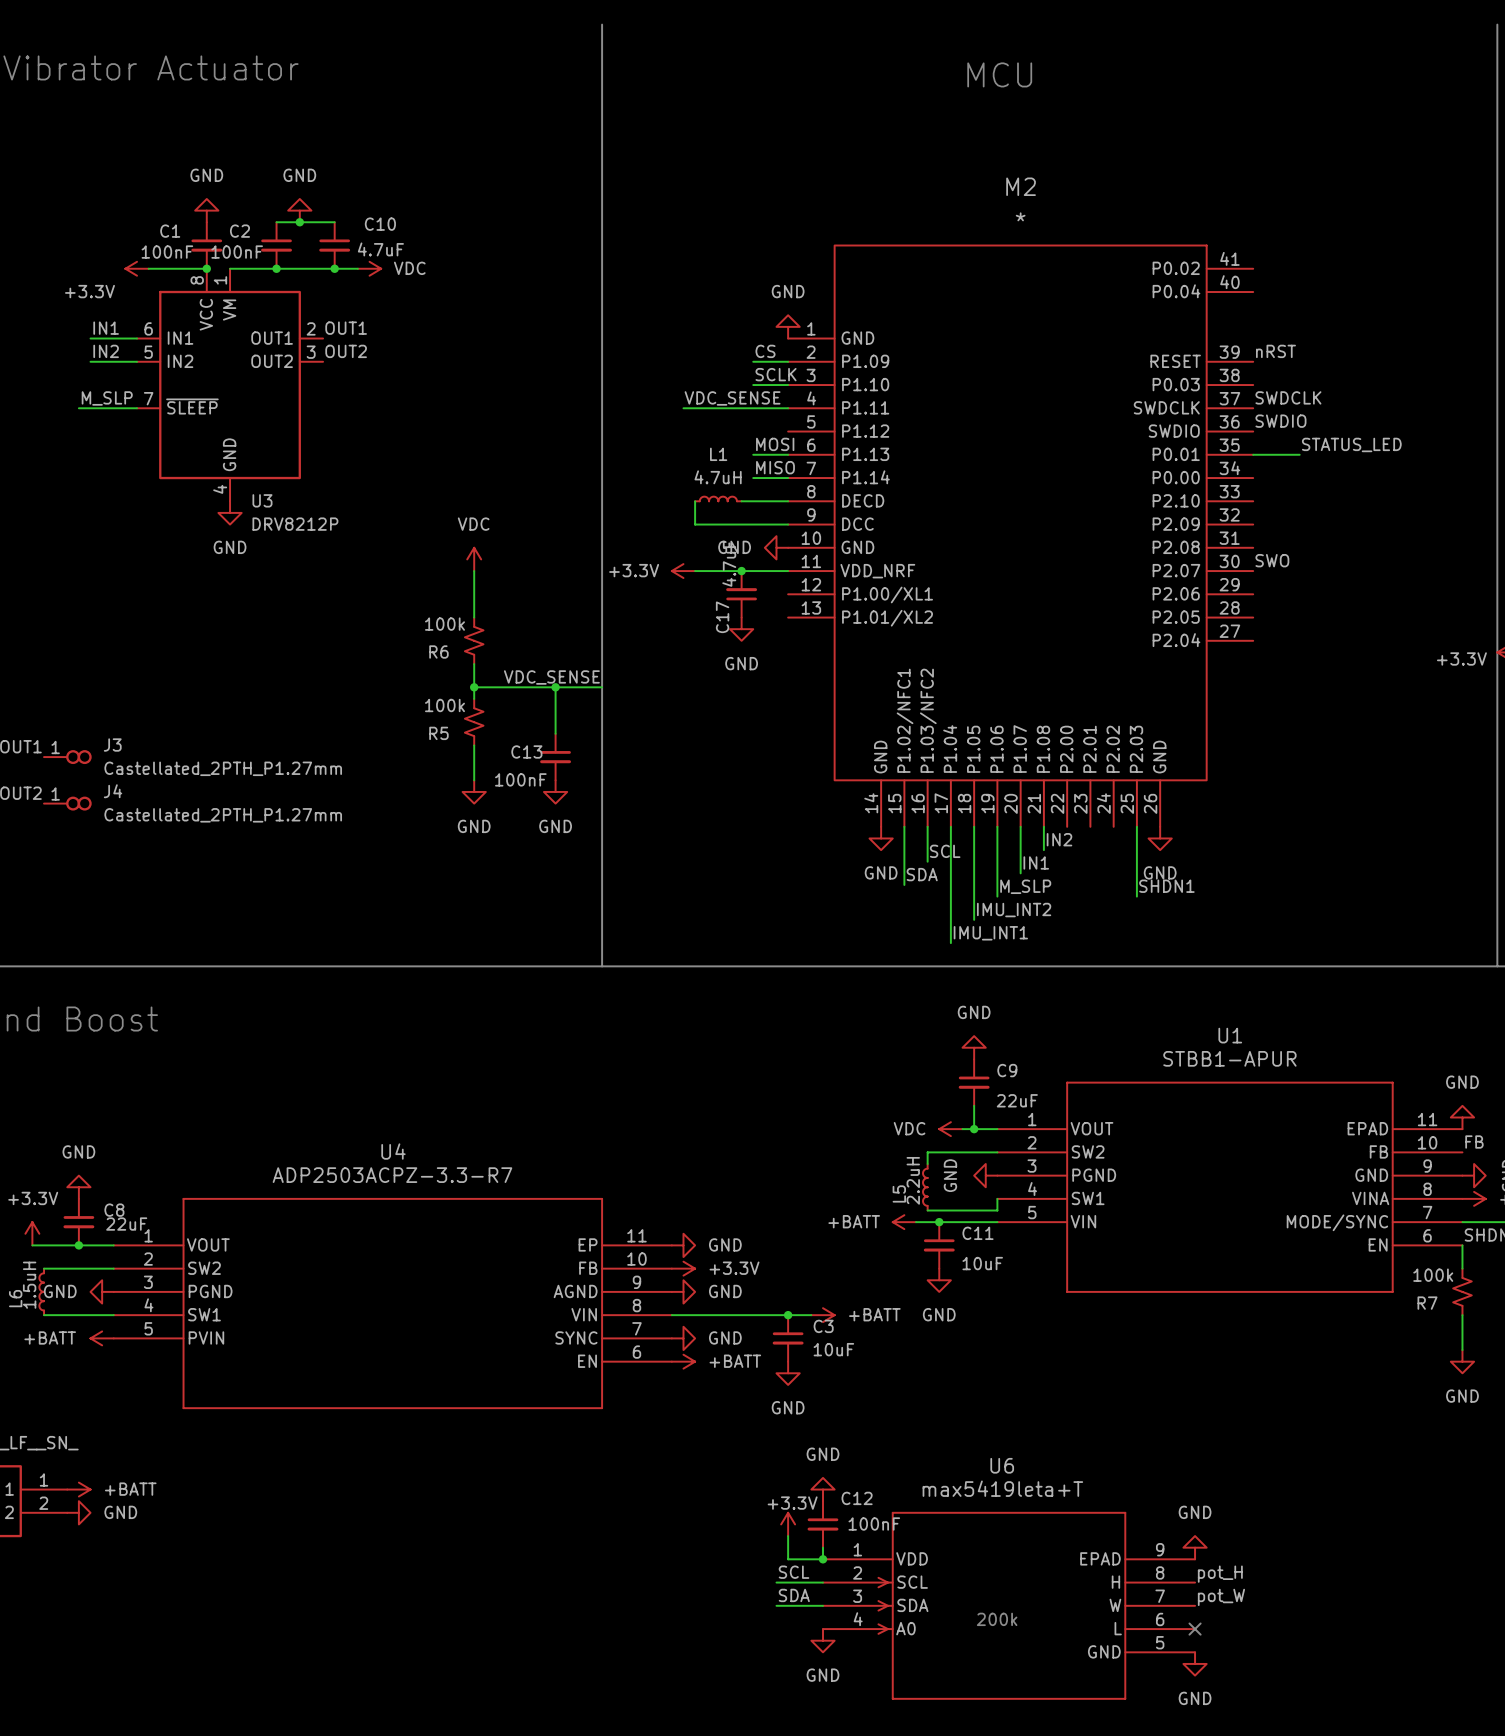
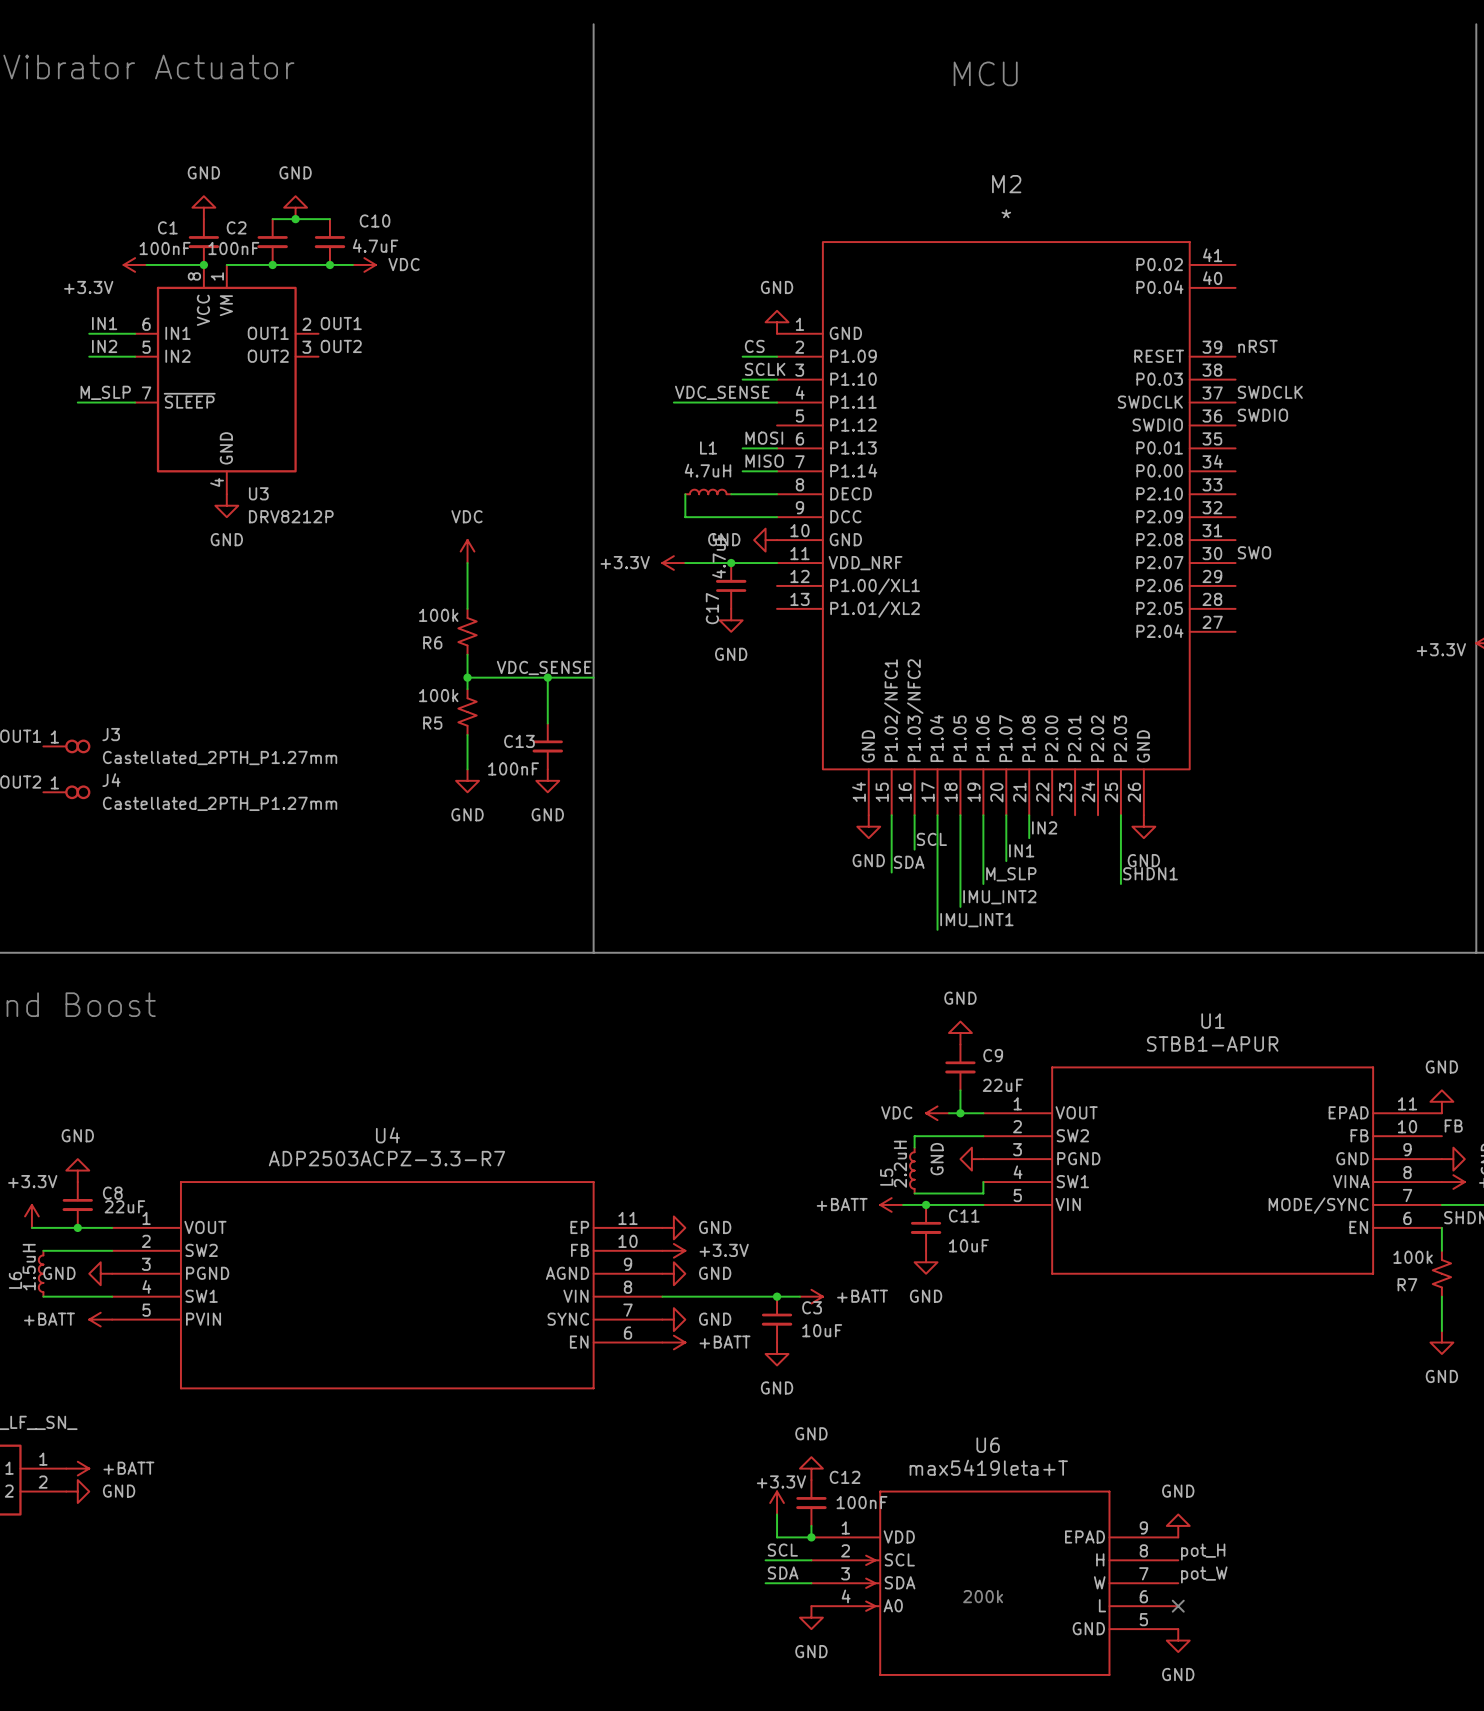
label: STATUS_LED (1351, 444) -> none
wire: (1253, 454) (1299, 454) -> none

